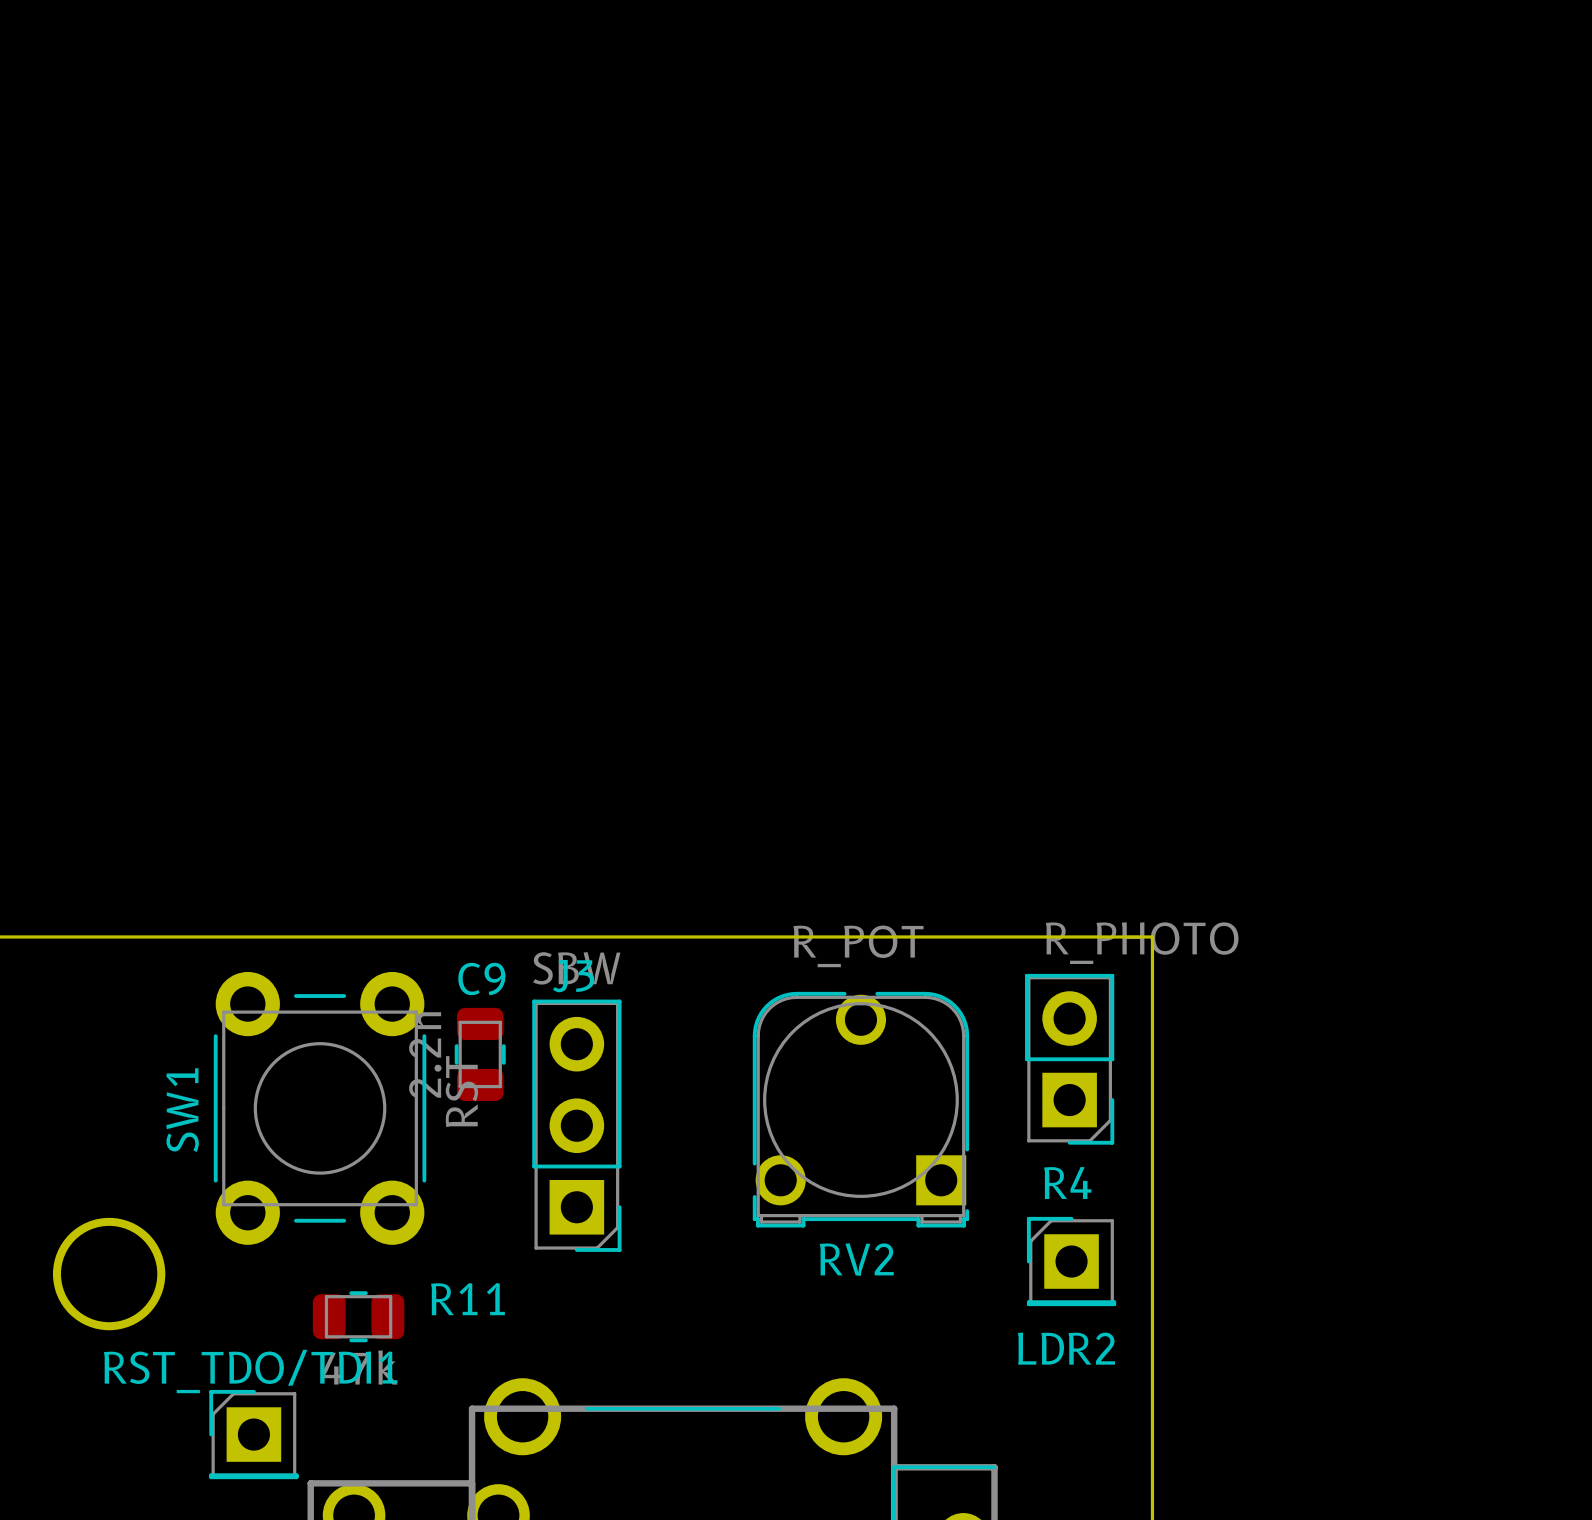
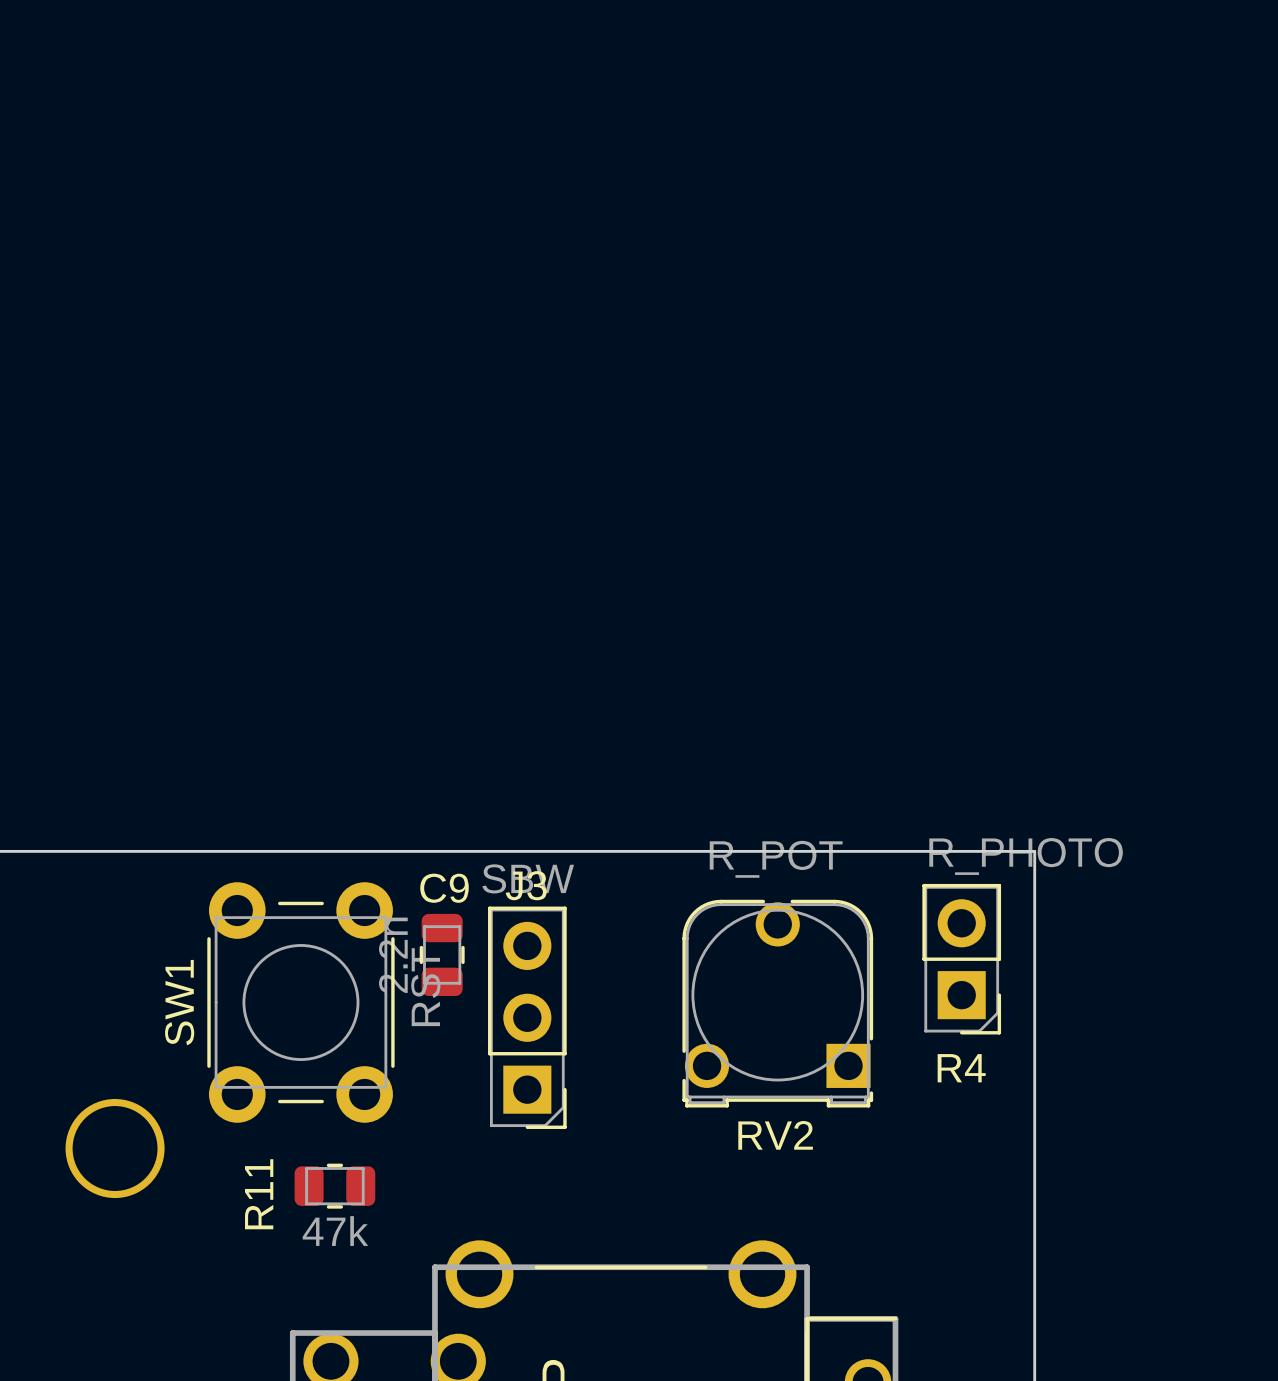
LDR2: (1071, 1261) -> none
R11 name rotation: 0° (467, 1299) -> 90° counterclockwise (259, 1194)
R11 name position: R11 (467, 1299) -> R11 (259, 1194)
RST_TDO/TDI1: (253, 1434) -> none

